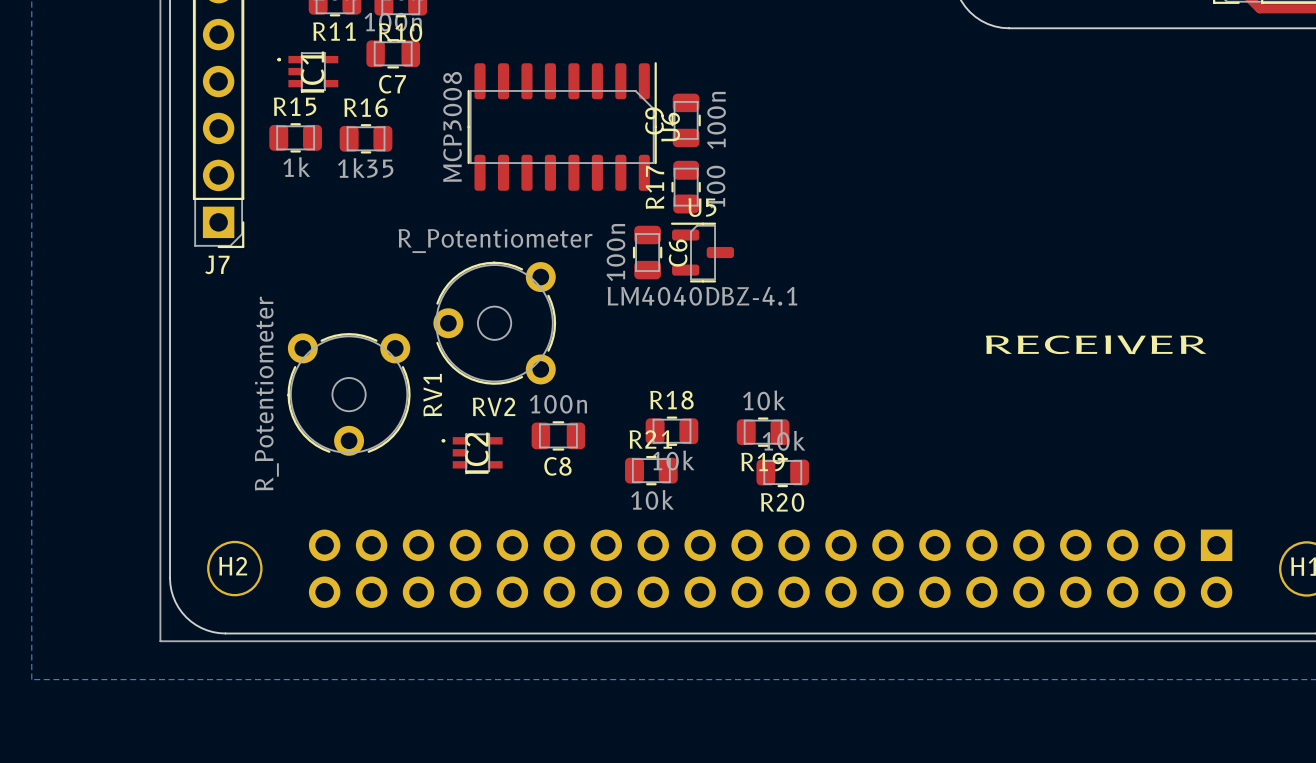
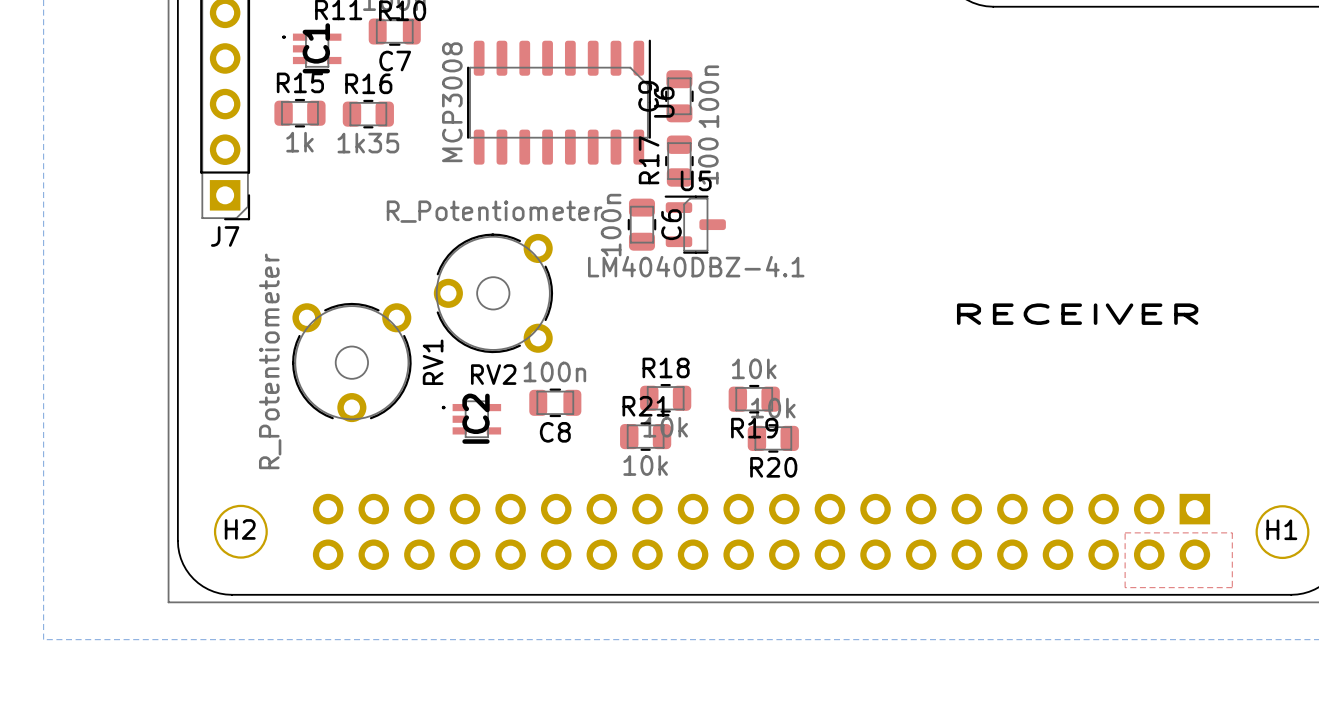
top zone outline: none -> (1125, 532) (1125, 587) (1232, 587) (1232, 532) (1125, 532)

